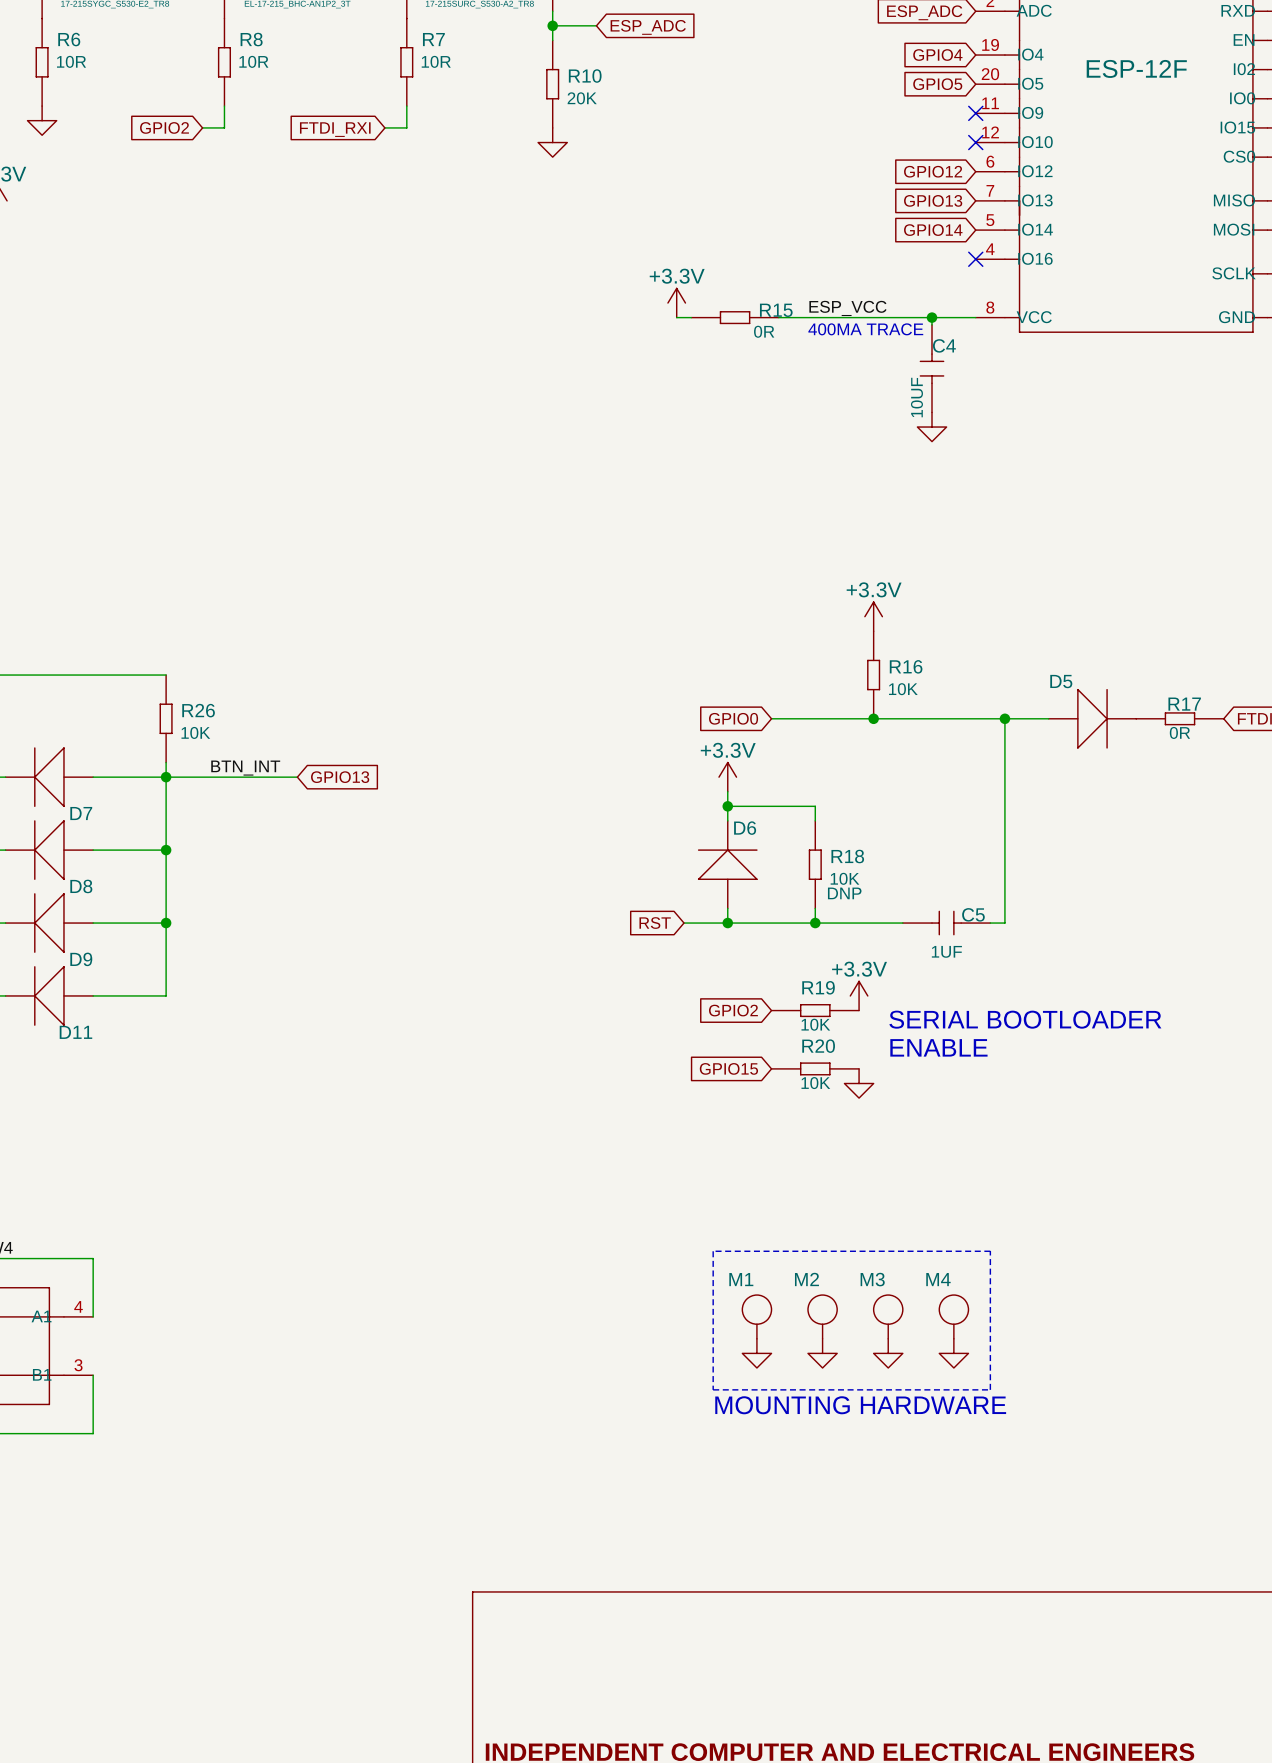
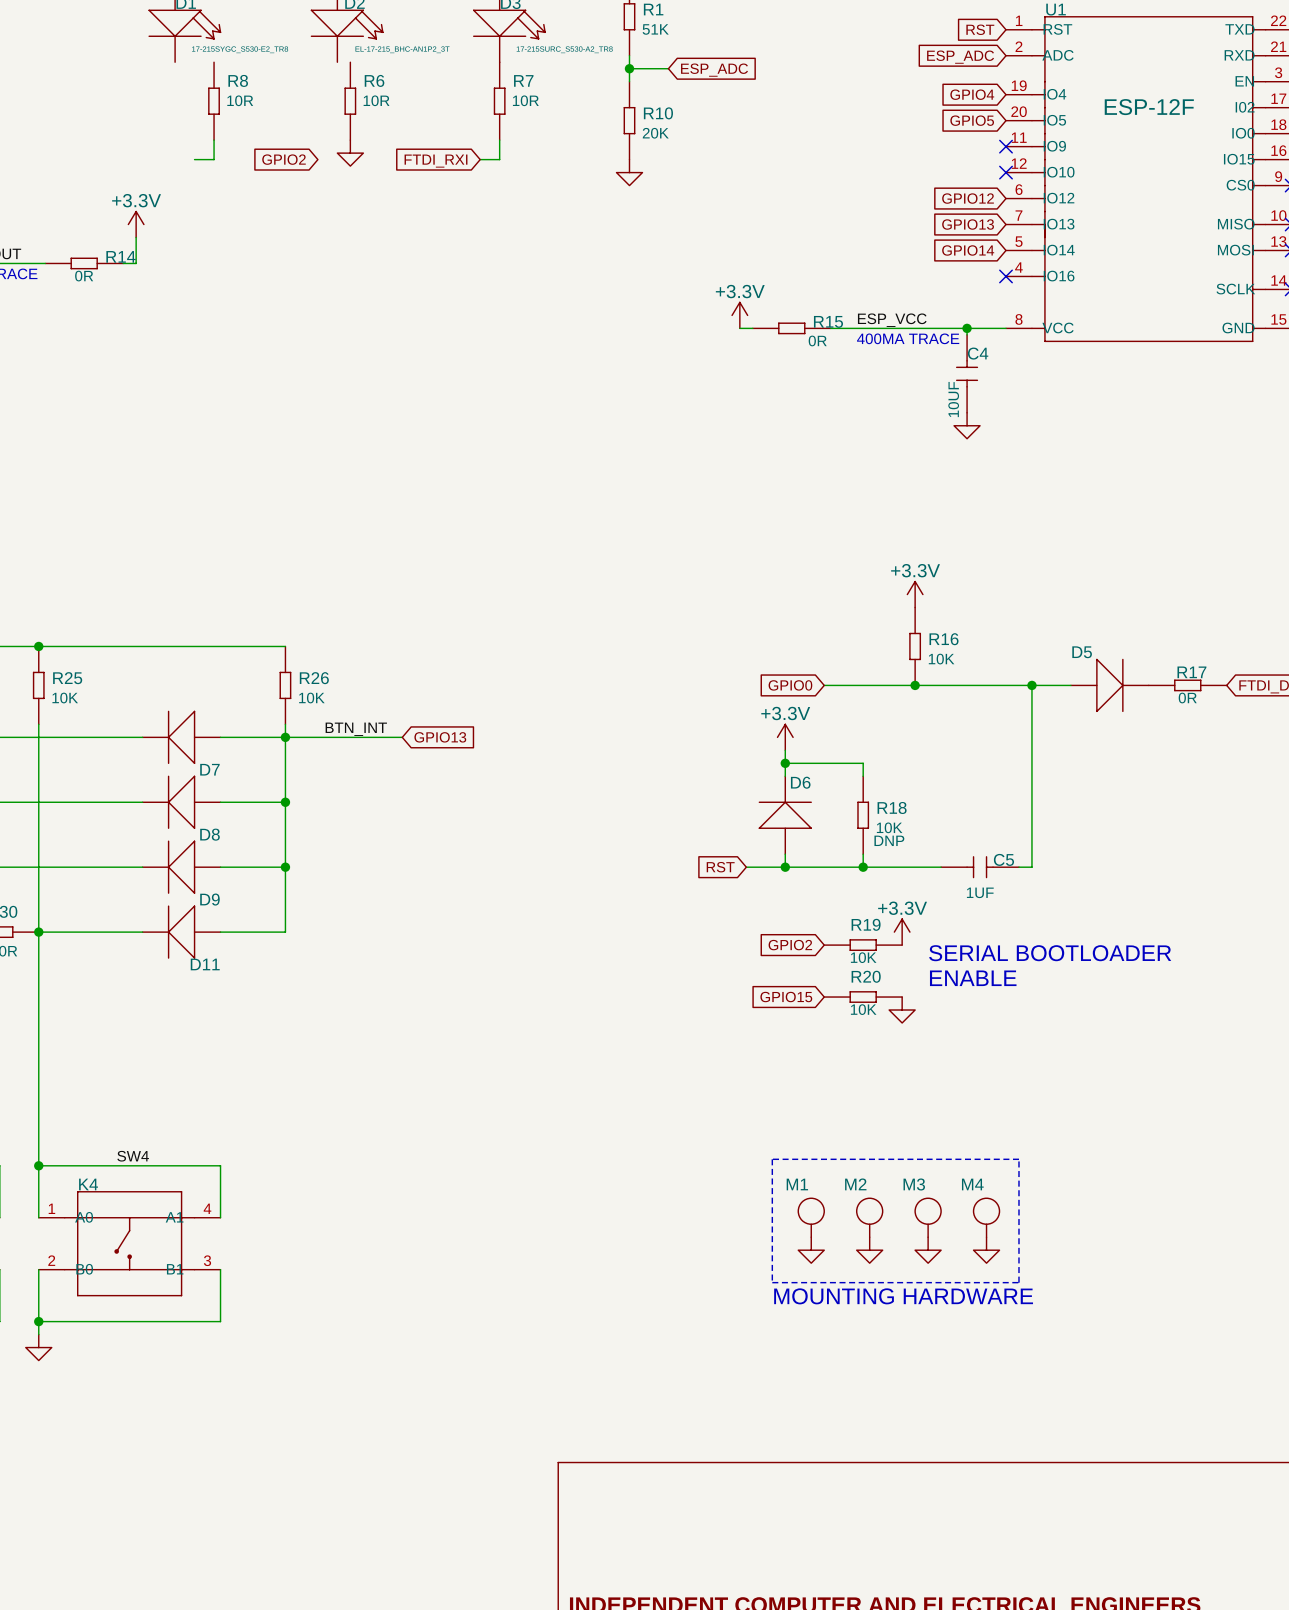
R6 position: (42, 62) -> (350, 101)
R8 position: (224, 62) -> (214, 101)
wire: (224, 106) (224, 127) (202, 127) -> (214, 140) (214, 159) (194, 159)
power symbol position: (42, 120) -> (350, 153)

